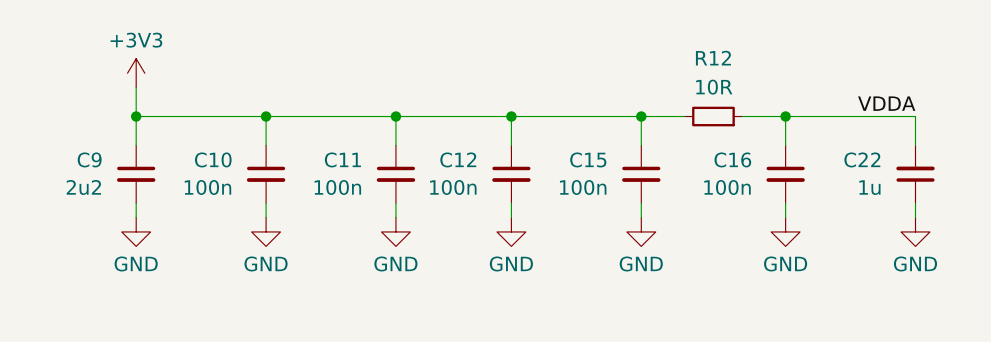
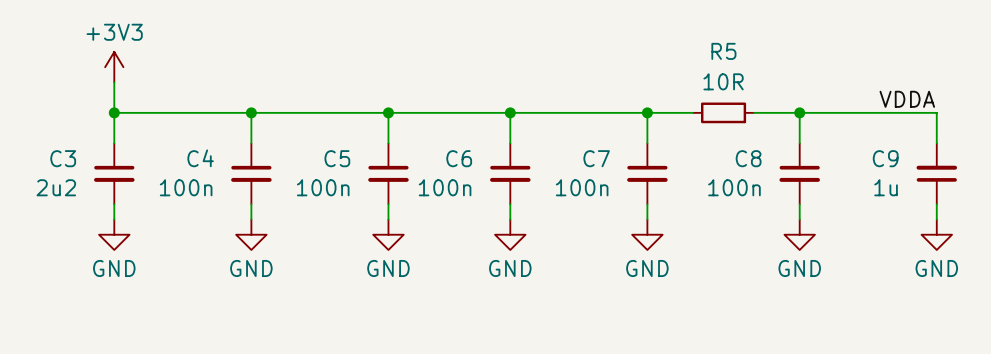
R12 name: R12 (713, 58) -> R5 (723, 51)
C9 name: C9 (89, 159) -> C3 (63, 158)
C10 name: C10 (213, 159) -> C4 (200, 158)
C11 name: C11 (342, 159) -> C5 (337, 158)
C12 name: C12 (458, 159) -> C6 (459, 158)
C15 name: C15 (588, 159) -> C7 (596, 158)
C16 name: C16 (732, 159) -> C8 (748, 158)
C22 name: C22 (862, 159) -> C9 (885, 158)

